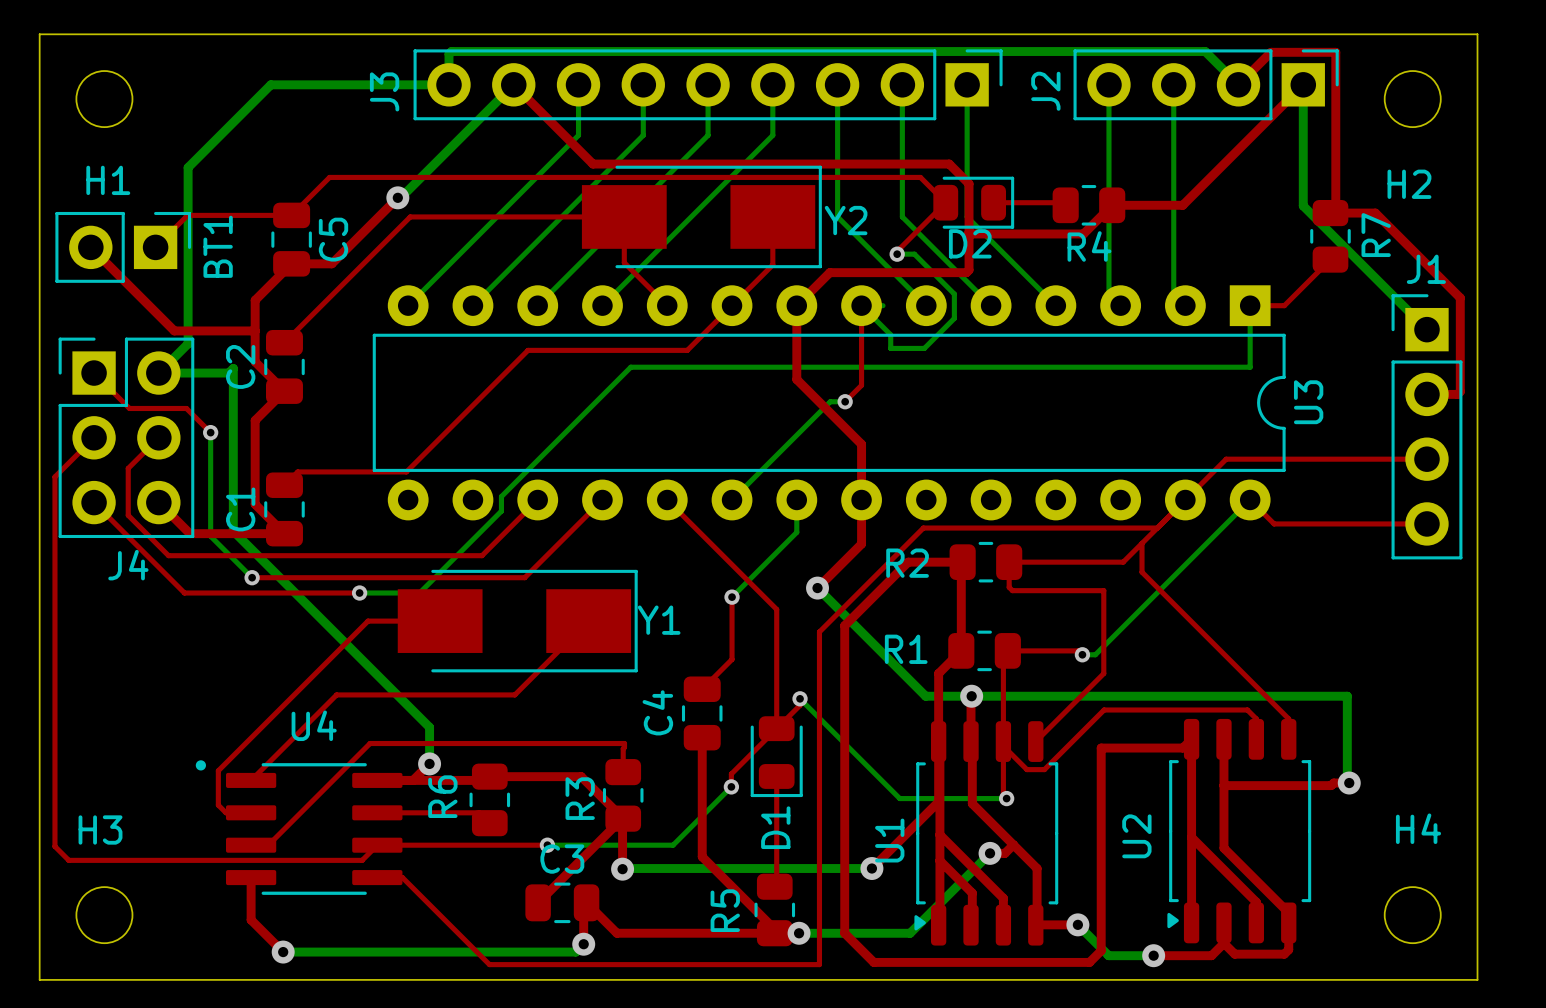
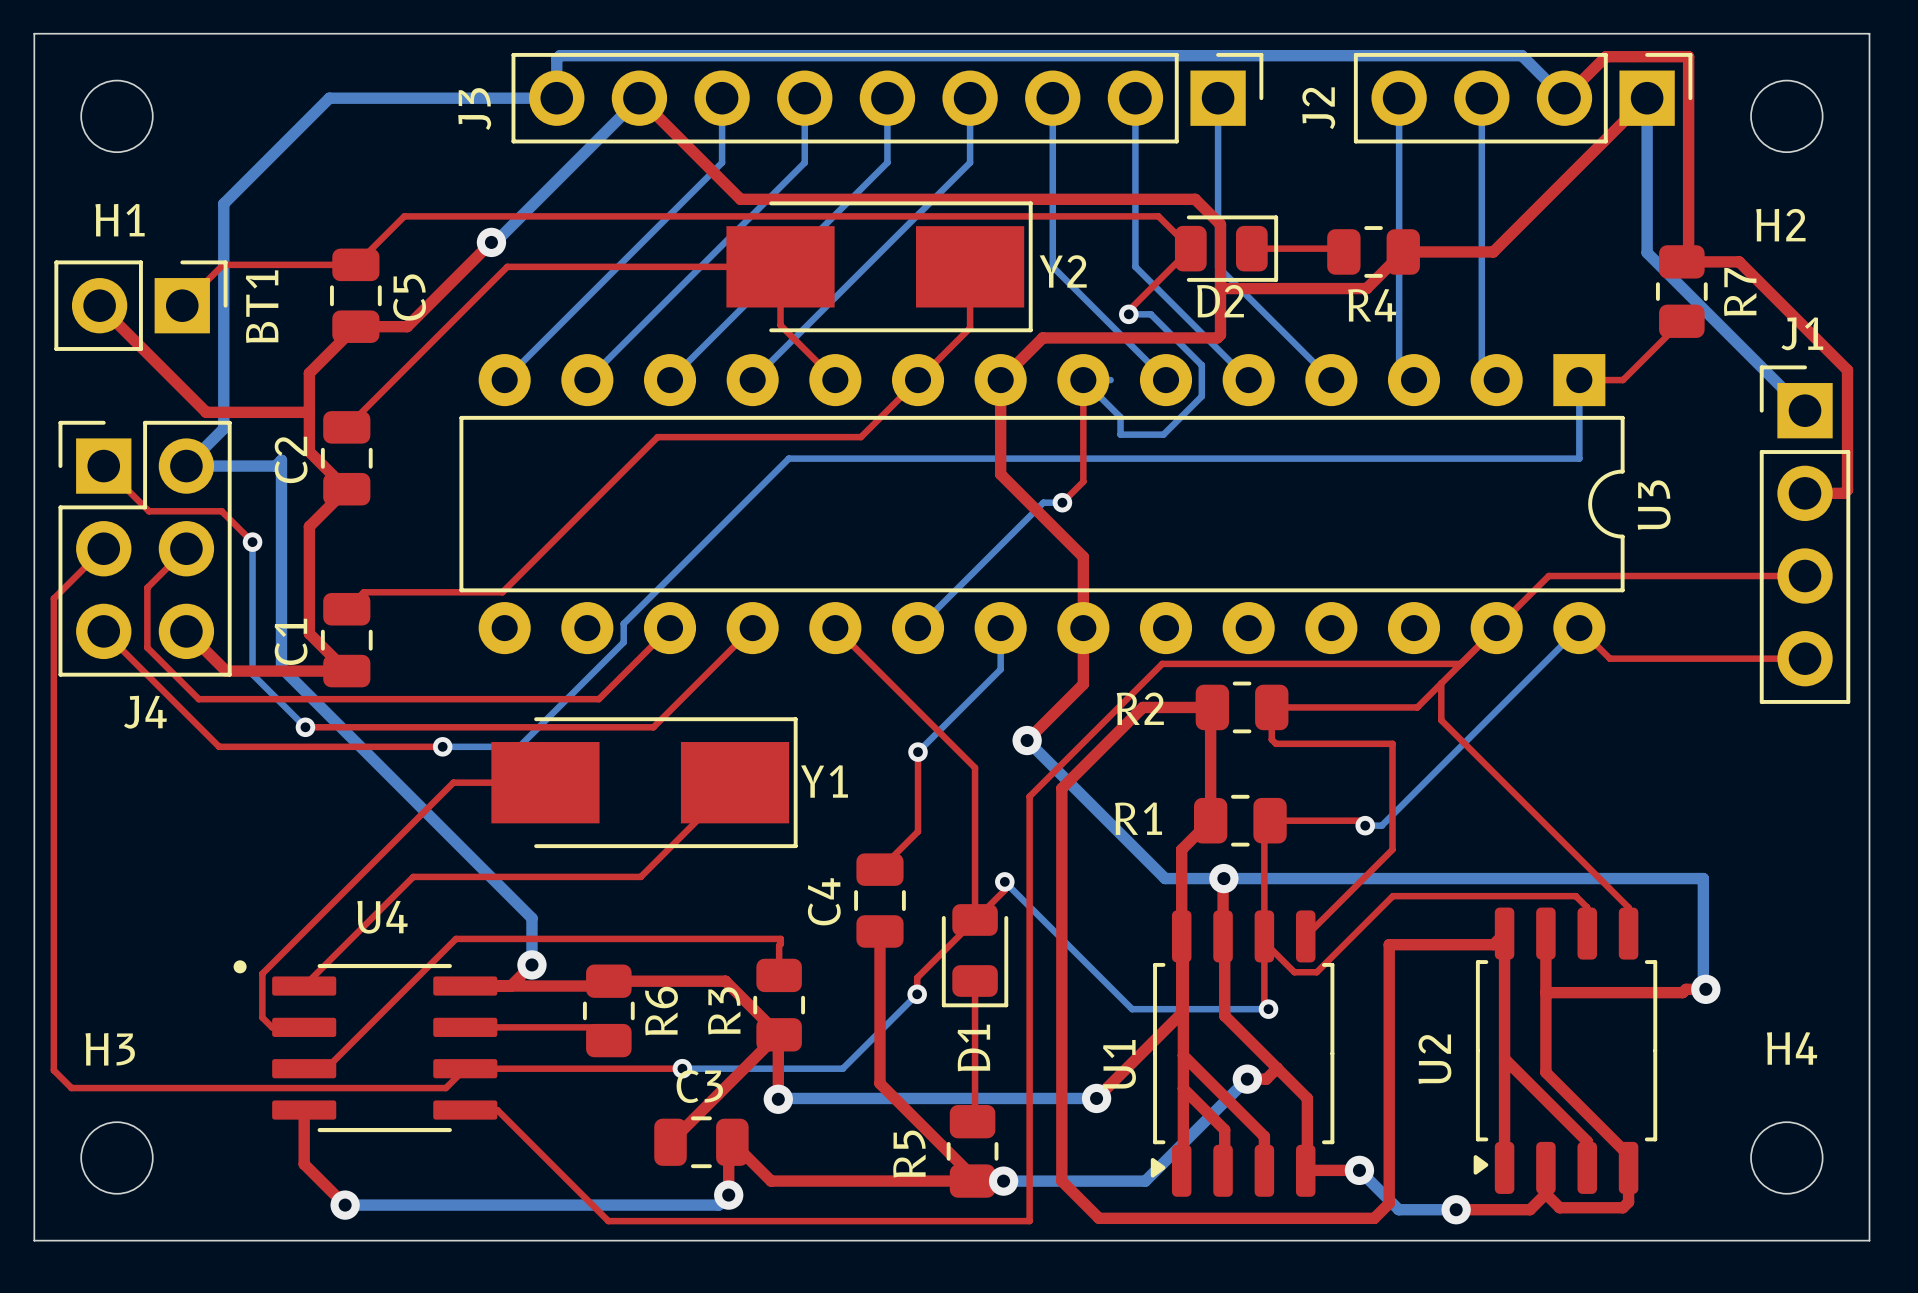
R6 name position: R6 (442, 796) -> R6 (661, 1011)

